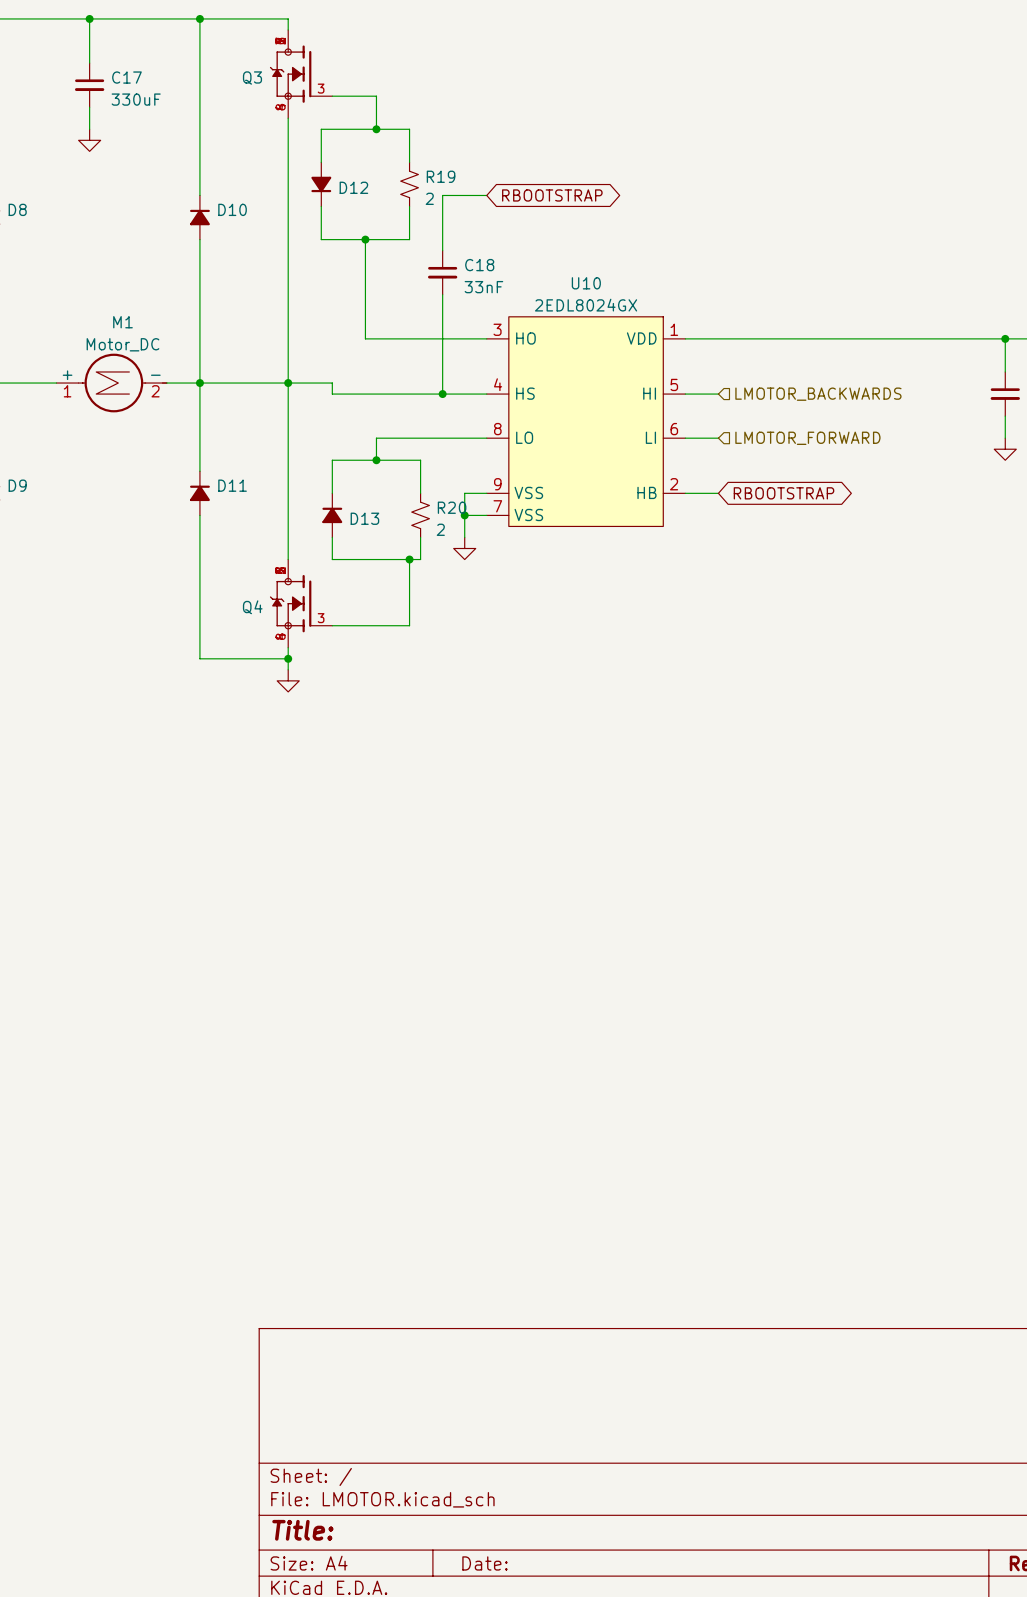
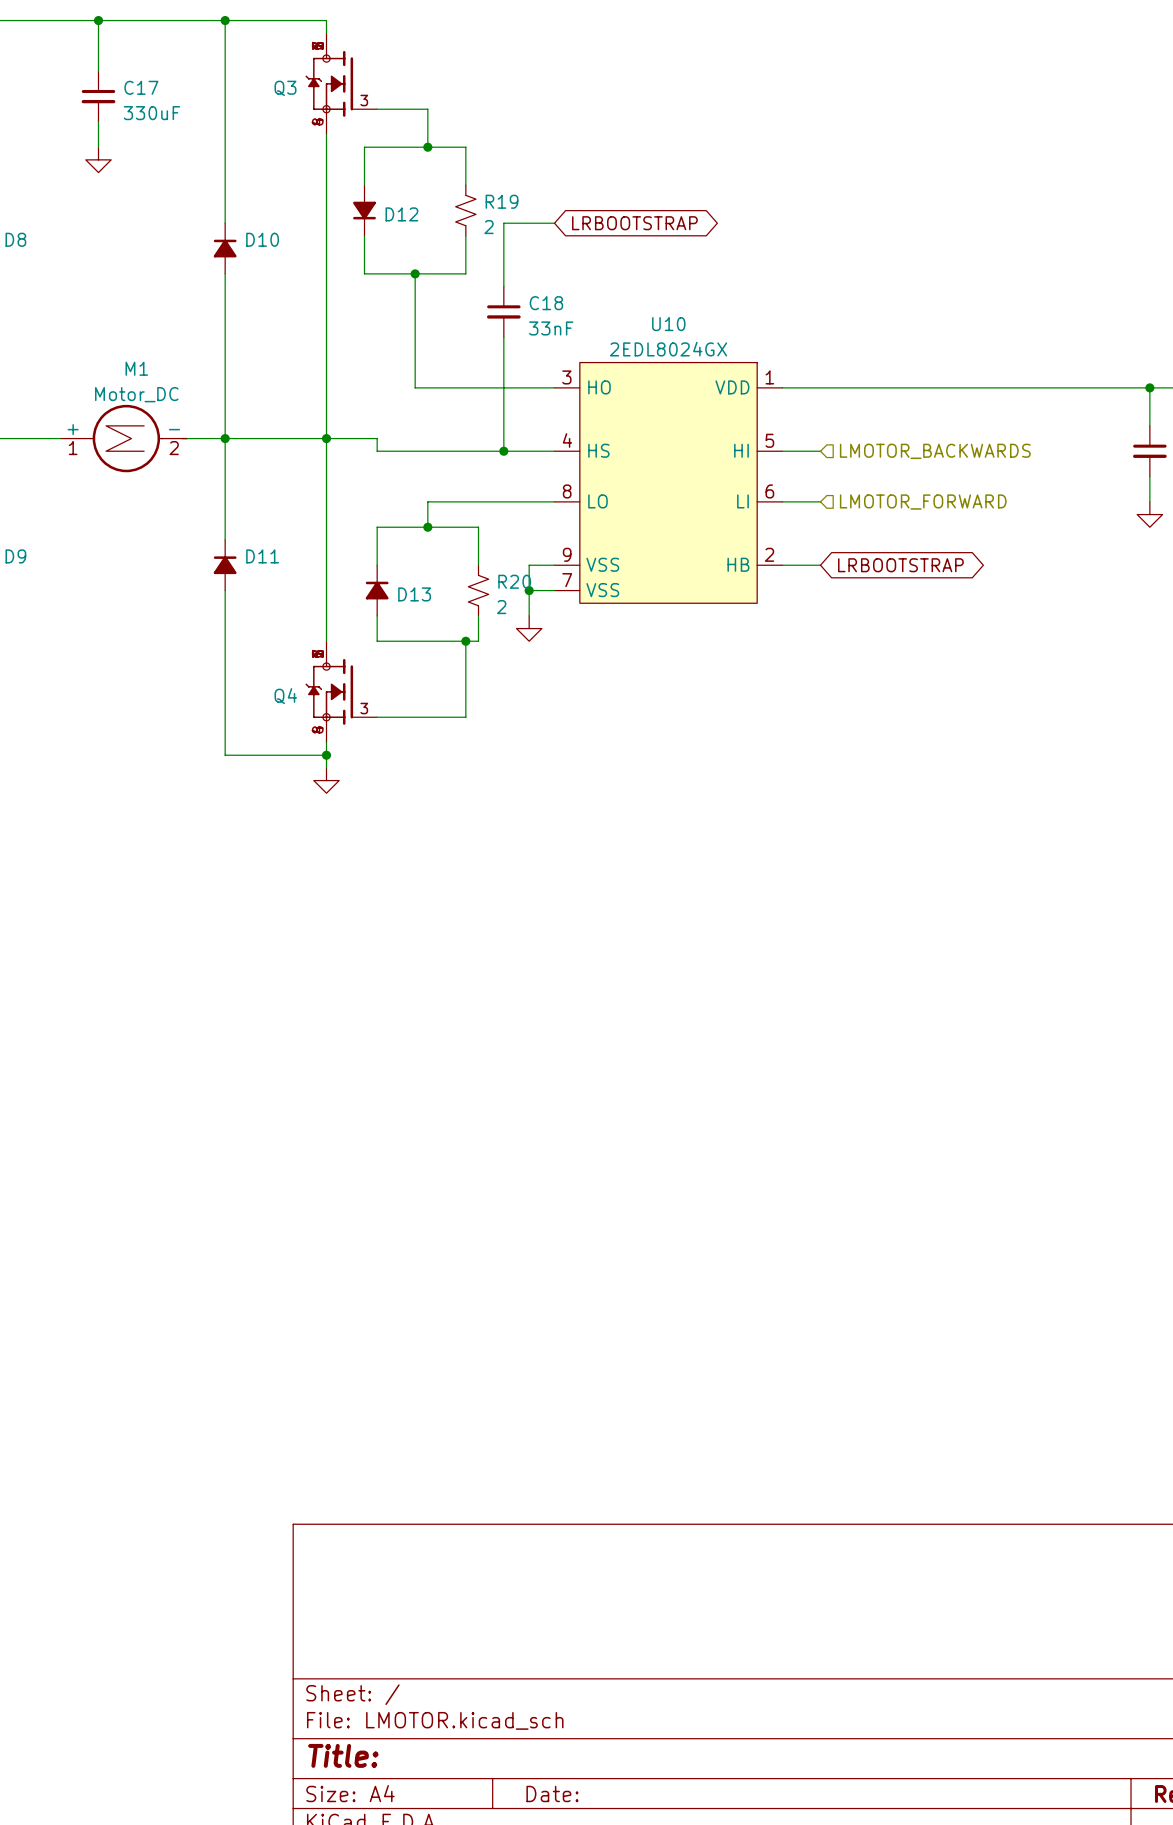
global label: RBOOTSTRAP (552, 195) -> LRBOOTSTRAP (634, 223)
global label: RBOOTSTRAP (784, 493) -> LRBOOTSTRAP (900, 565)

